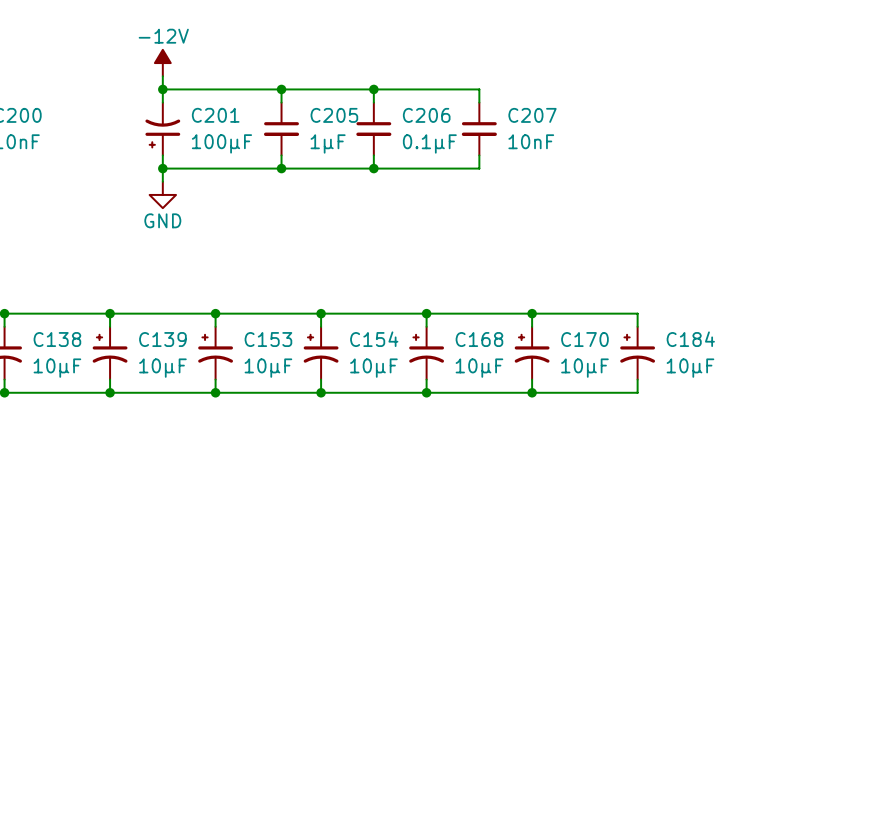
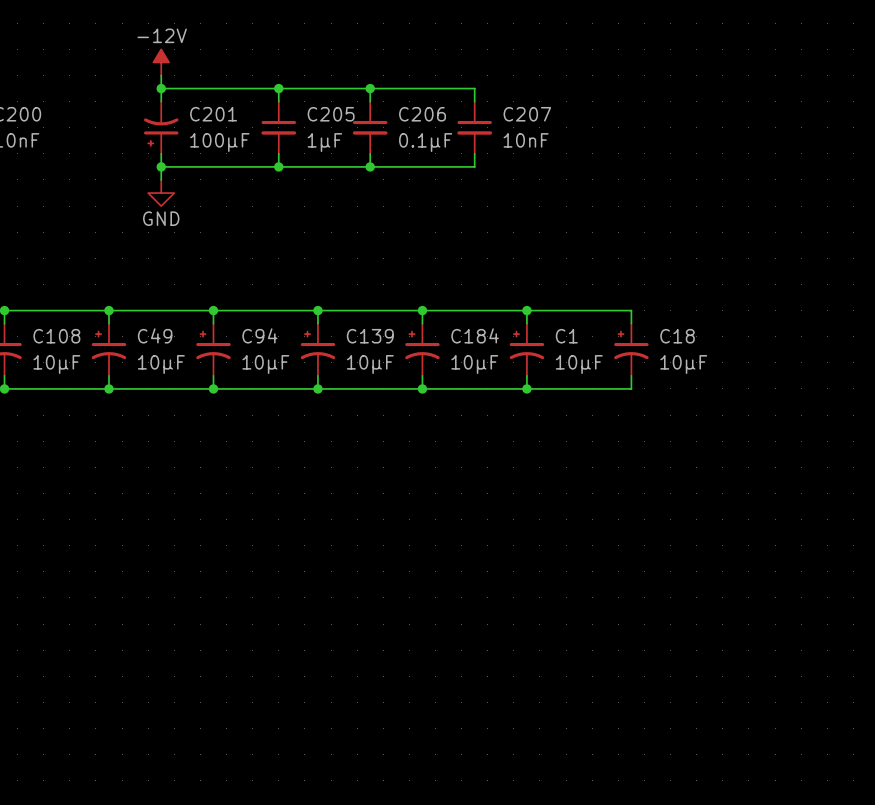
C138 name: C138 (57, 339) -> C108 (56, 336)
C139 name: C139 (162, 339) -> C49 (155, 335)
C153 name: C153 (268, 339) -> C94 (259, 335)
C154 name: C154 (374, 339) -> C139 (370, 336)
C168 name: C168 (479, 339) -> C184 (475, 335)
C170 name: C170 (584, 339) -> C1 (566, 336)
C184 name: C184 (690, 339) -> C18 (677, 336)

